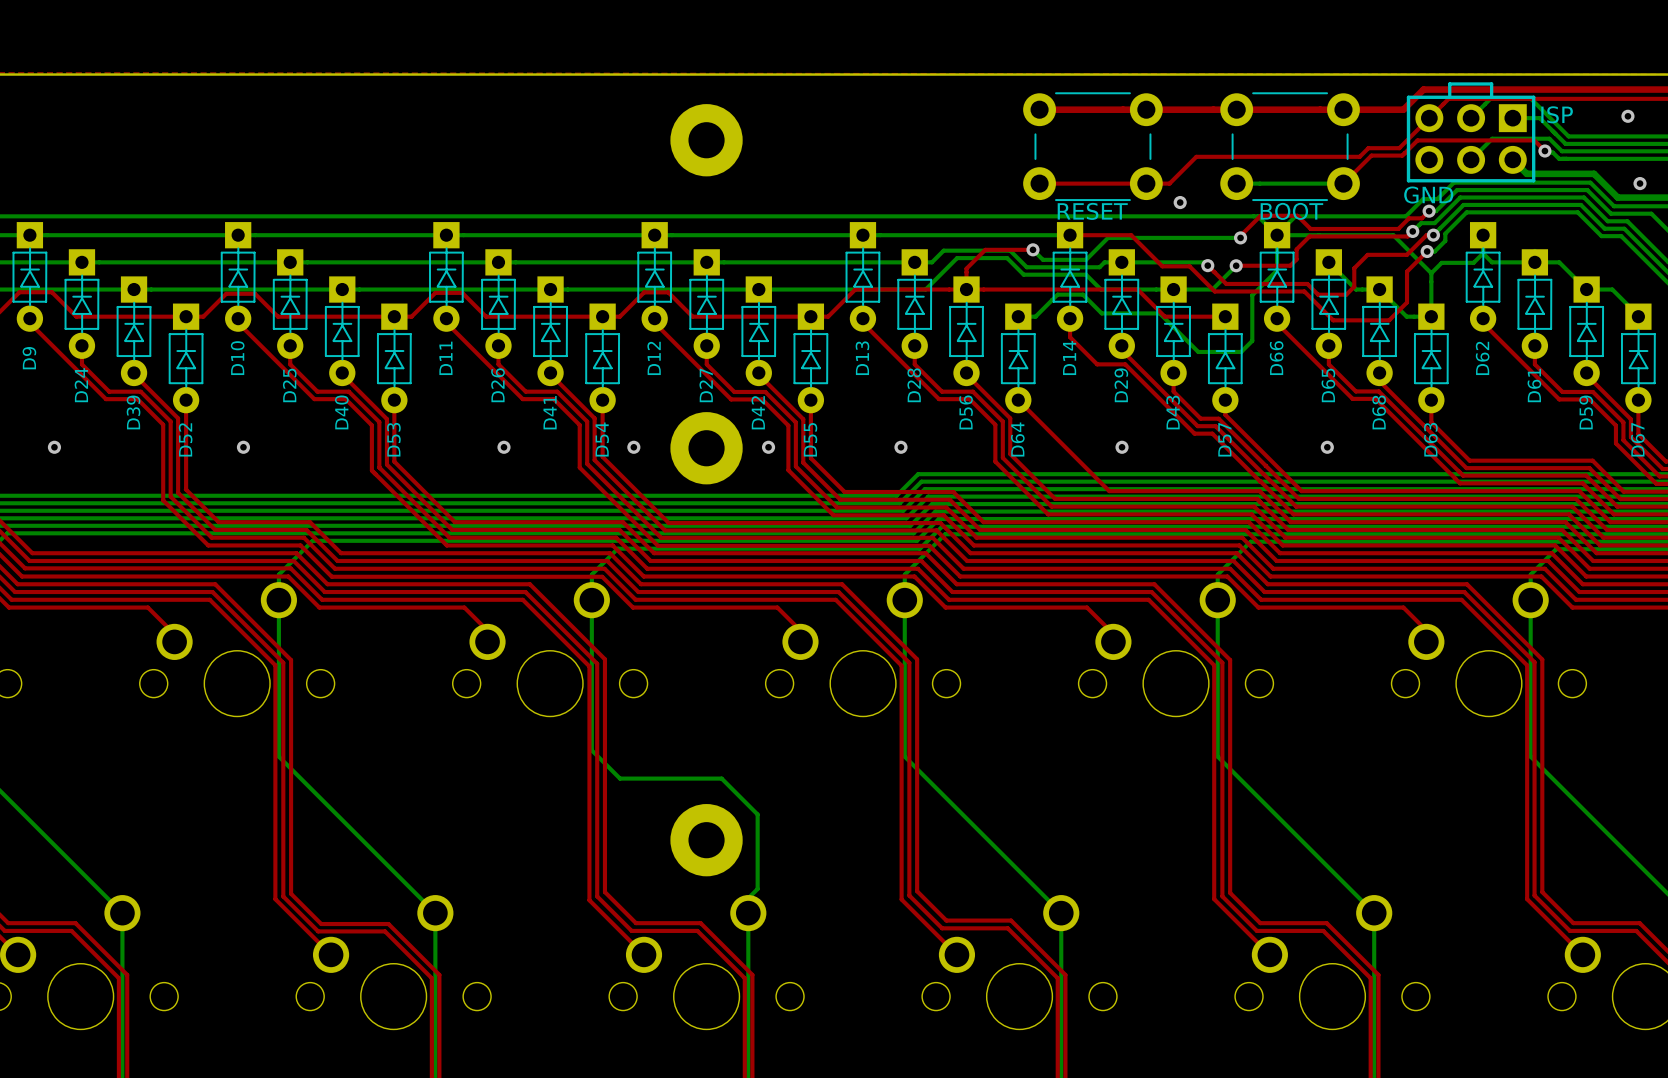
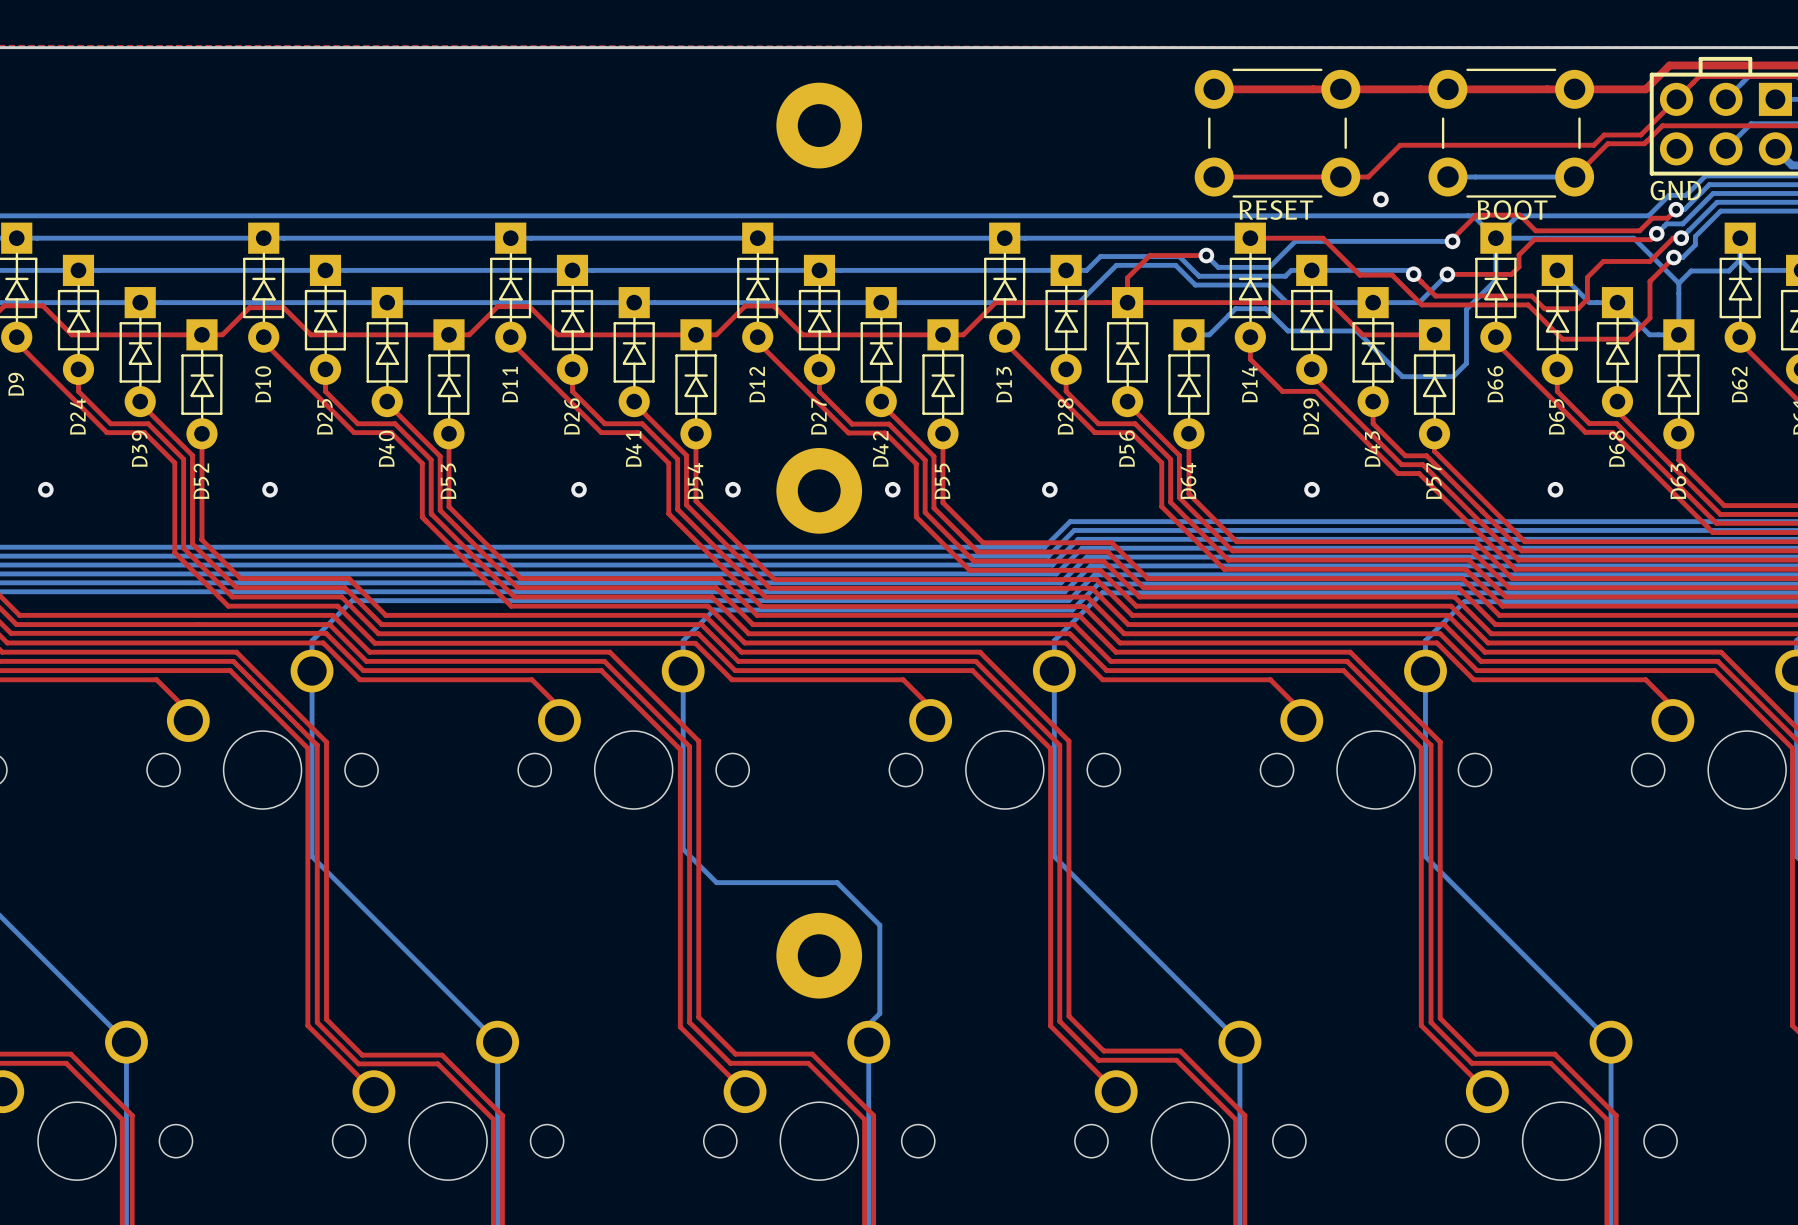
top track: (1018, 400) (1109, 491) -> (1188, 433) (1188, 493) (1236, 541) (1296, 541)

